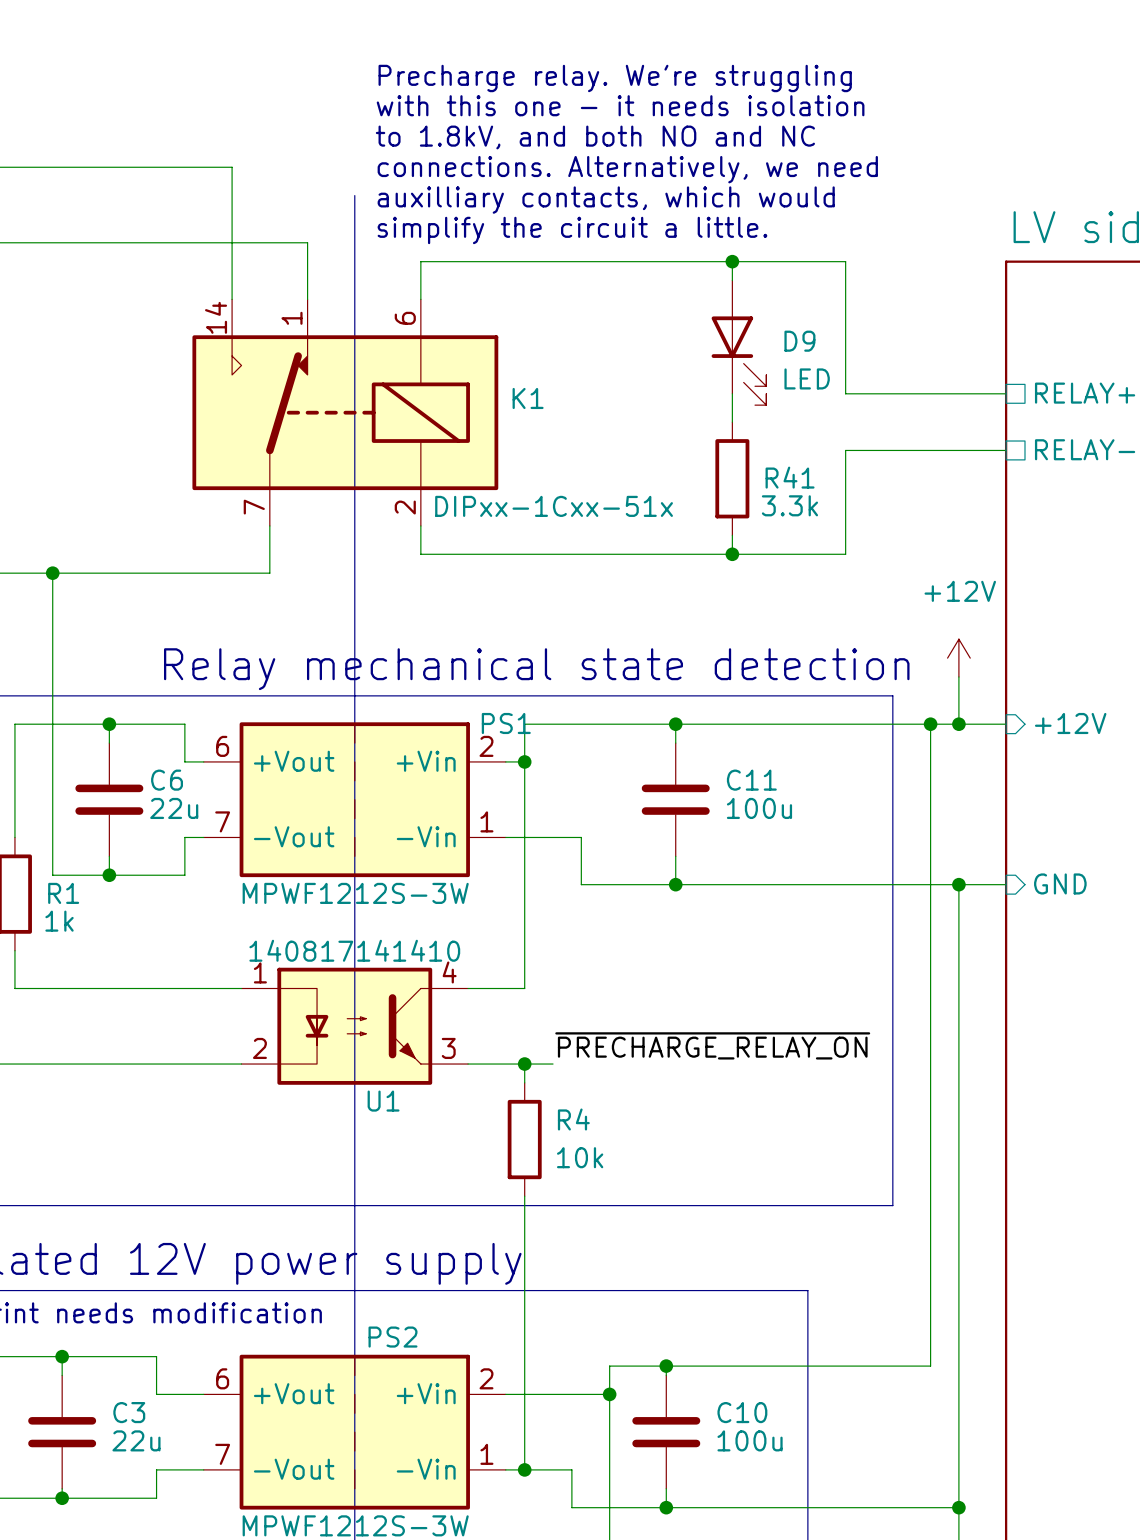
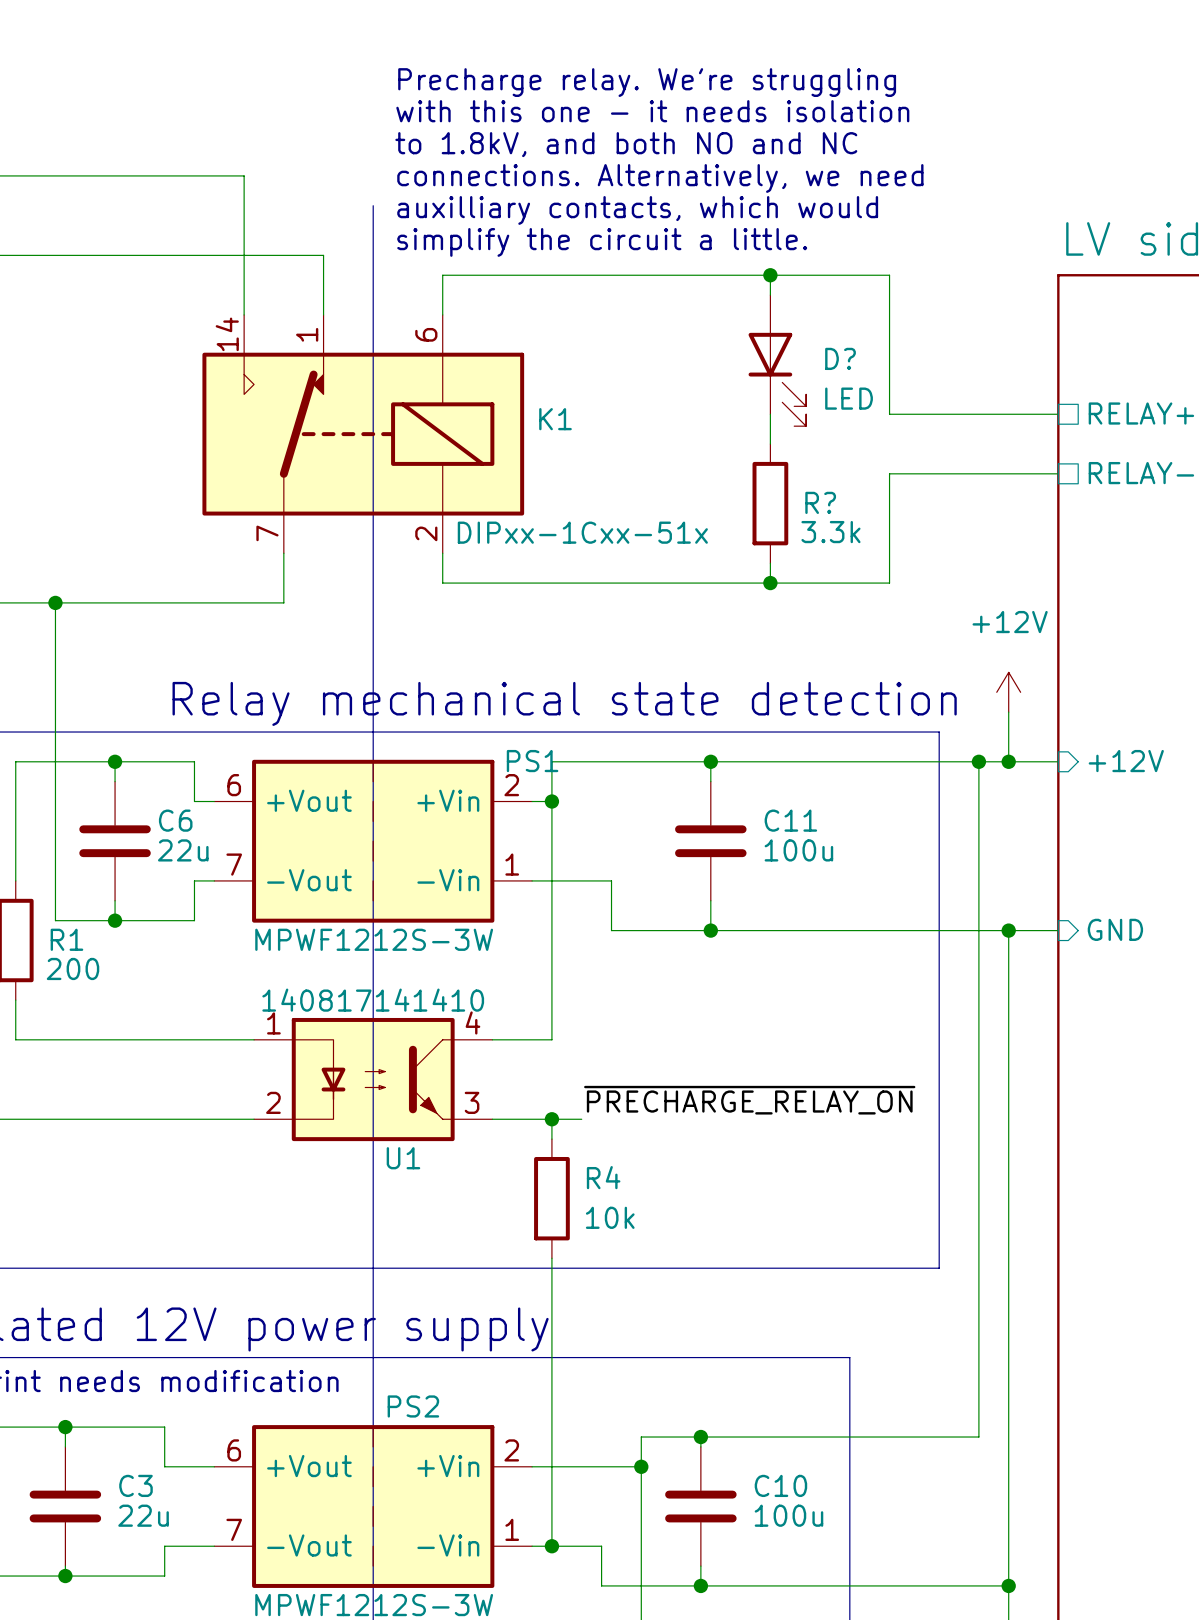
D9 name: D9 (799, 341) -> D? (840, 358)
R41 name: R41 (790, 477) -> R? (820, 502)
R1 value: 1k (59, 921) -> 200 (73, 968)

